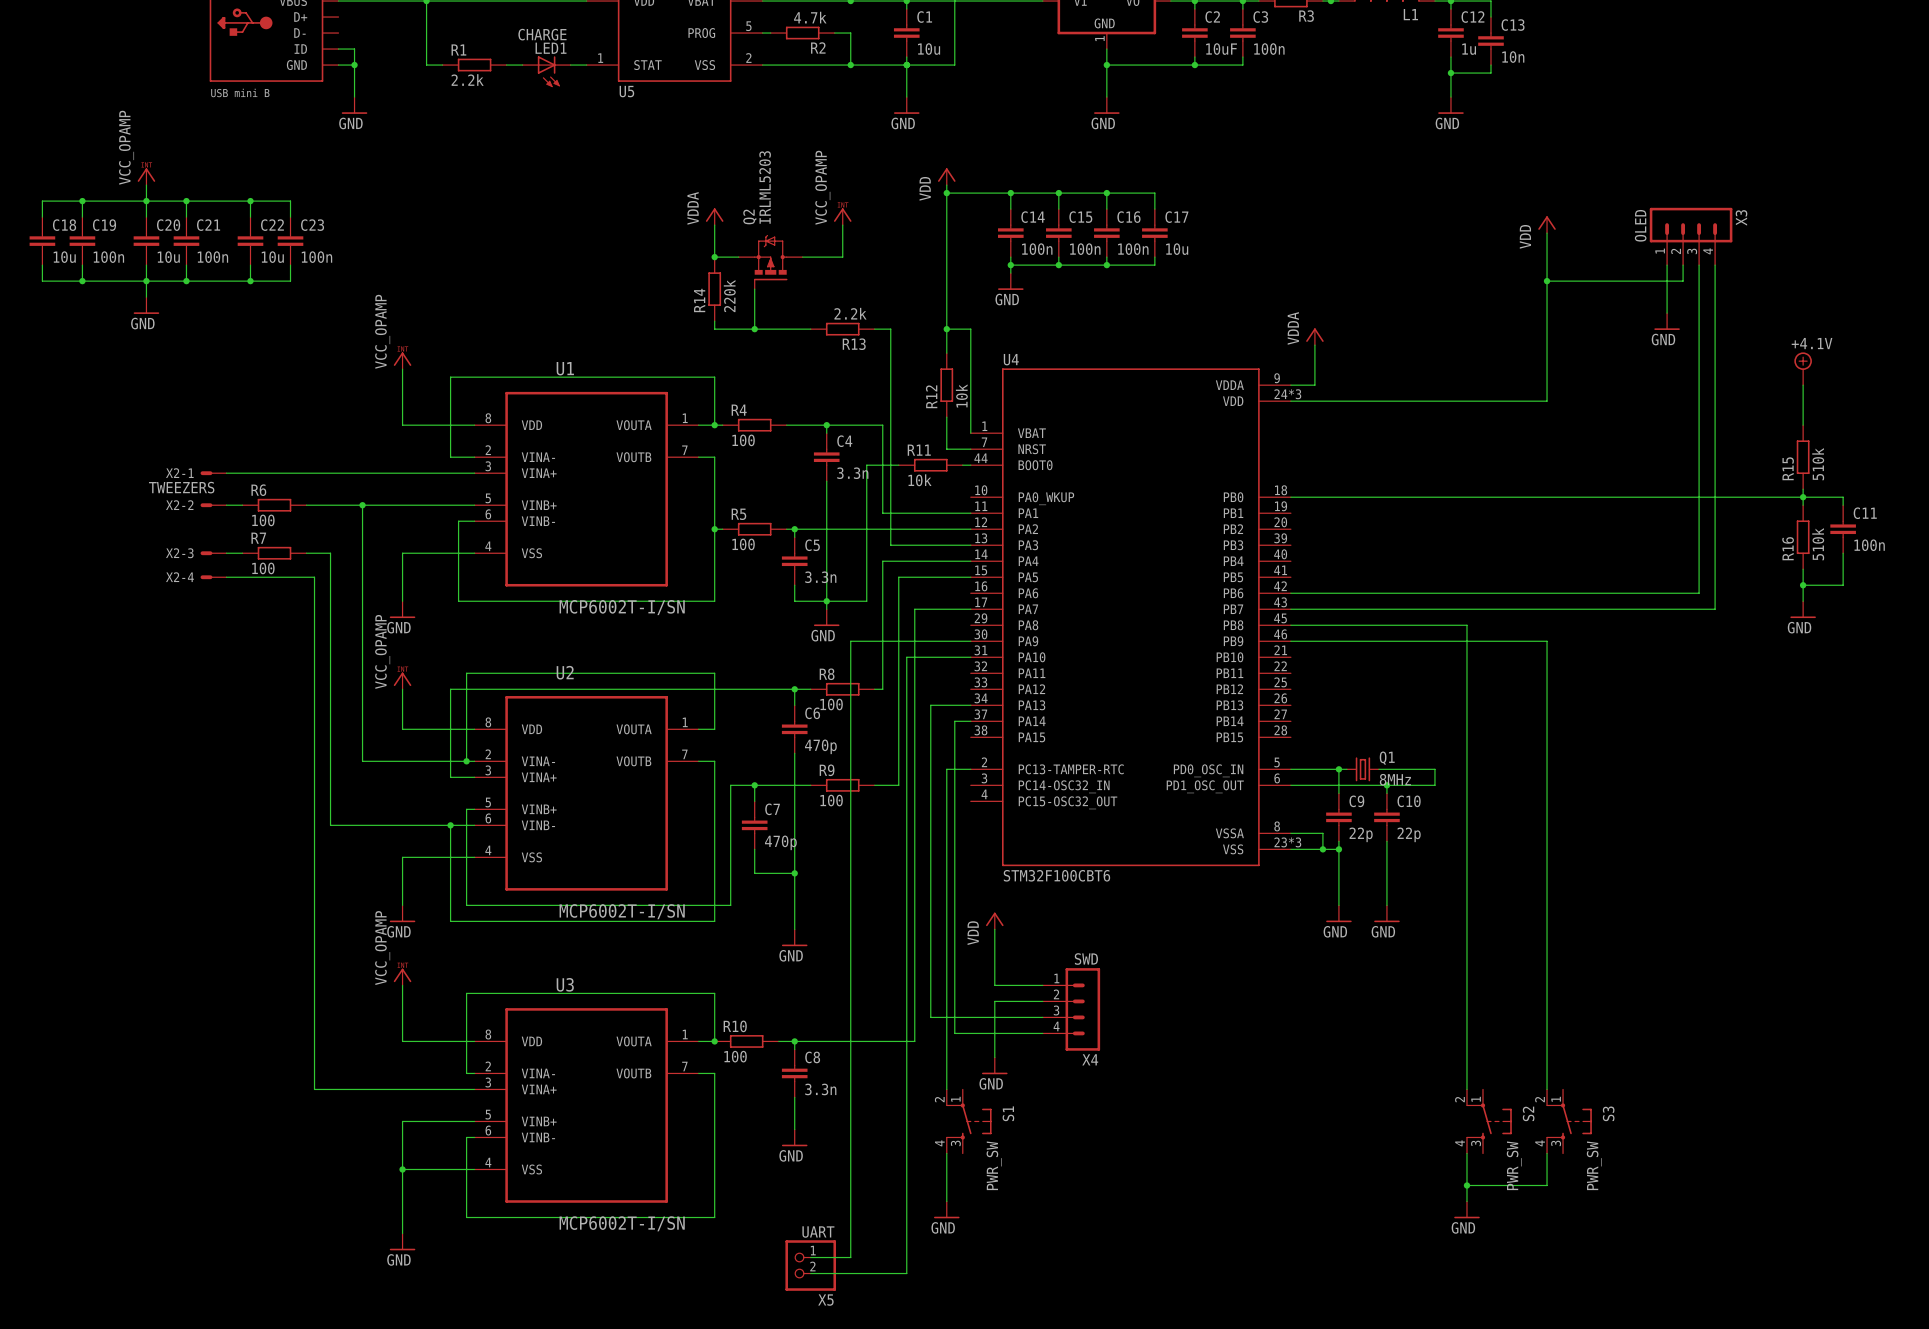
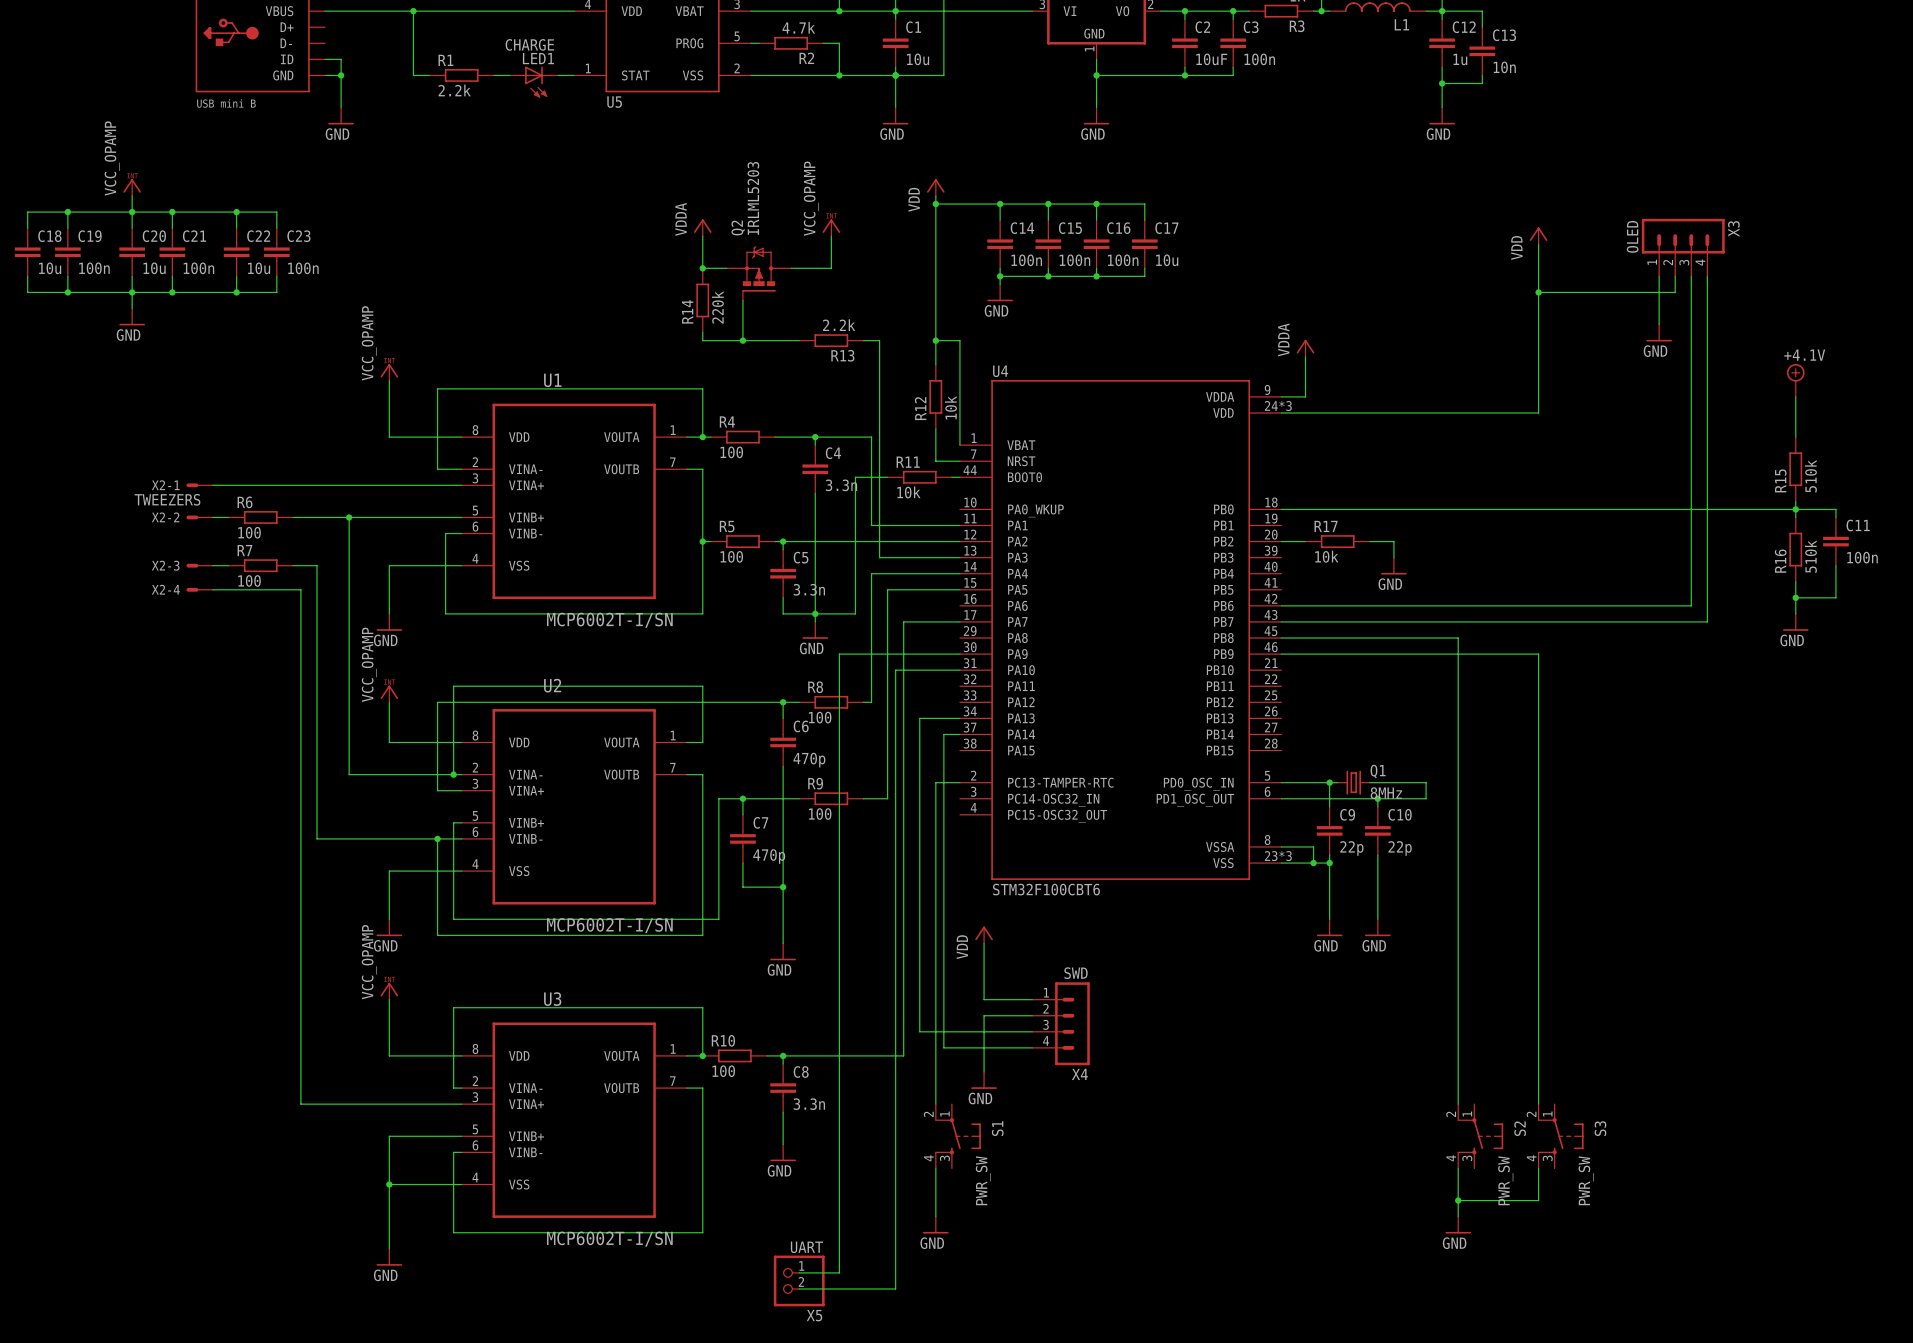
wire: none -> (1281, 541) (1305, 541)
R17: none -> 10k (1337, 541)
wire: none -> (1369, 541) (1393, 541) (1393, 557)
power symbol: none -> GND (1393, 566)

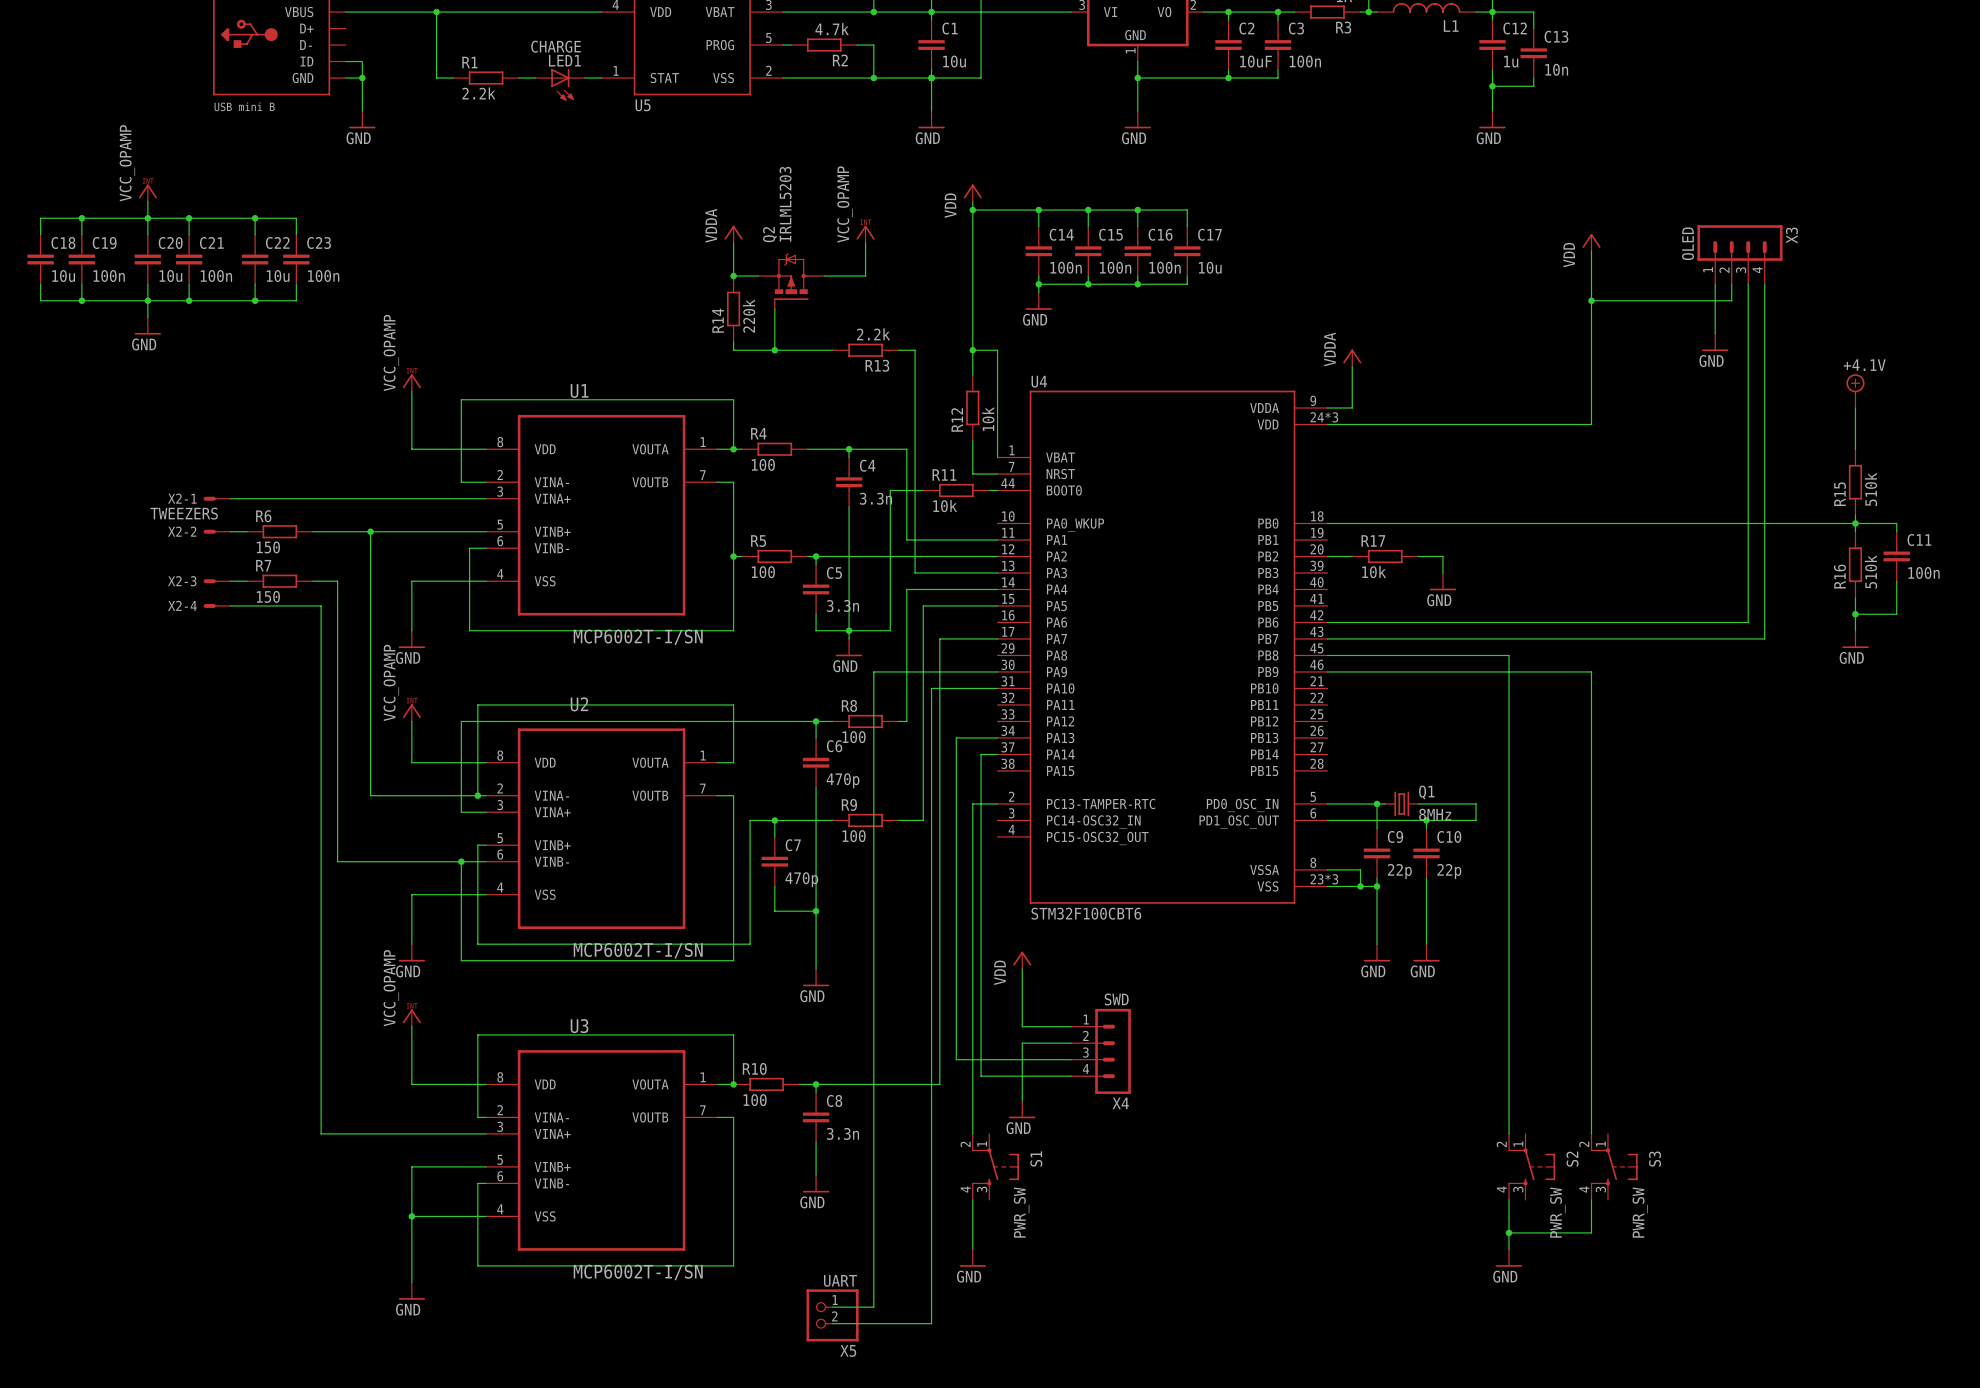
R6 value: 100 (249, 532) -> 150 (268, 547)
R7 value: 100 (249, 580) -> 150 (268, 596)

